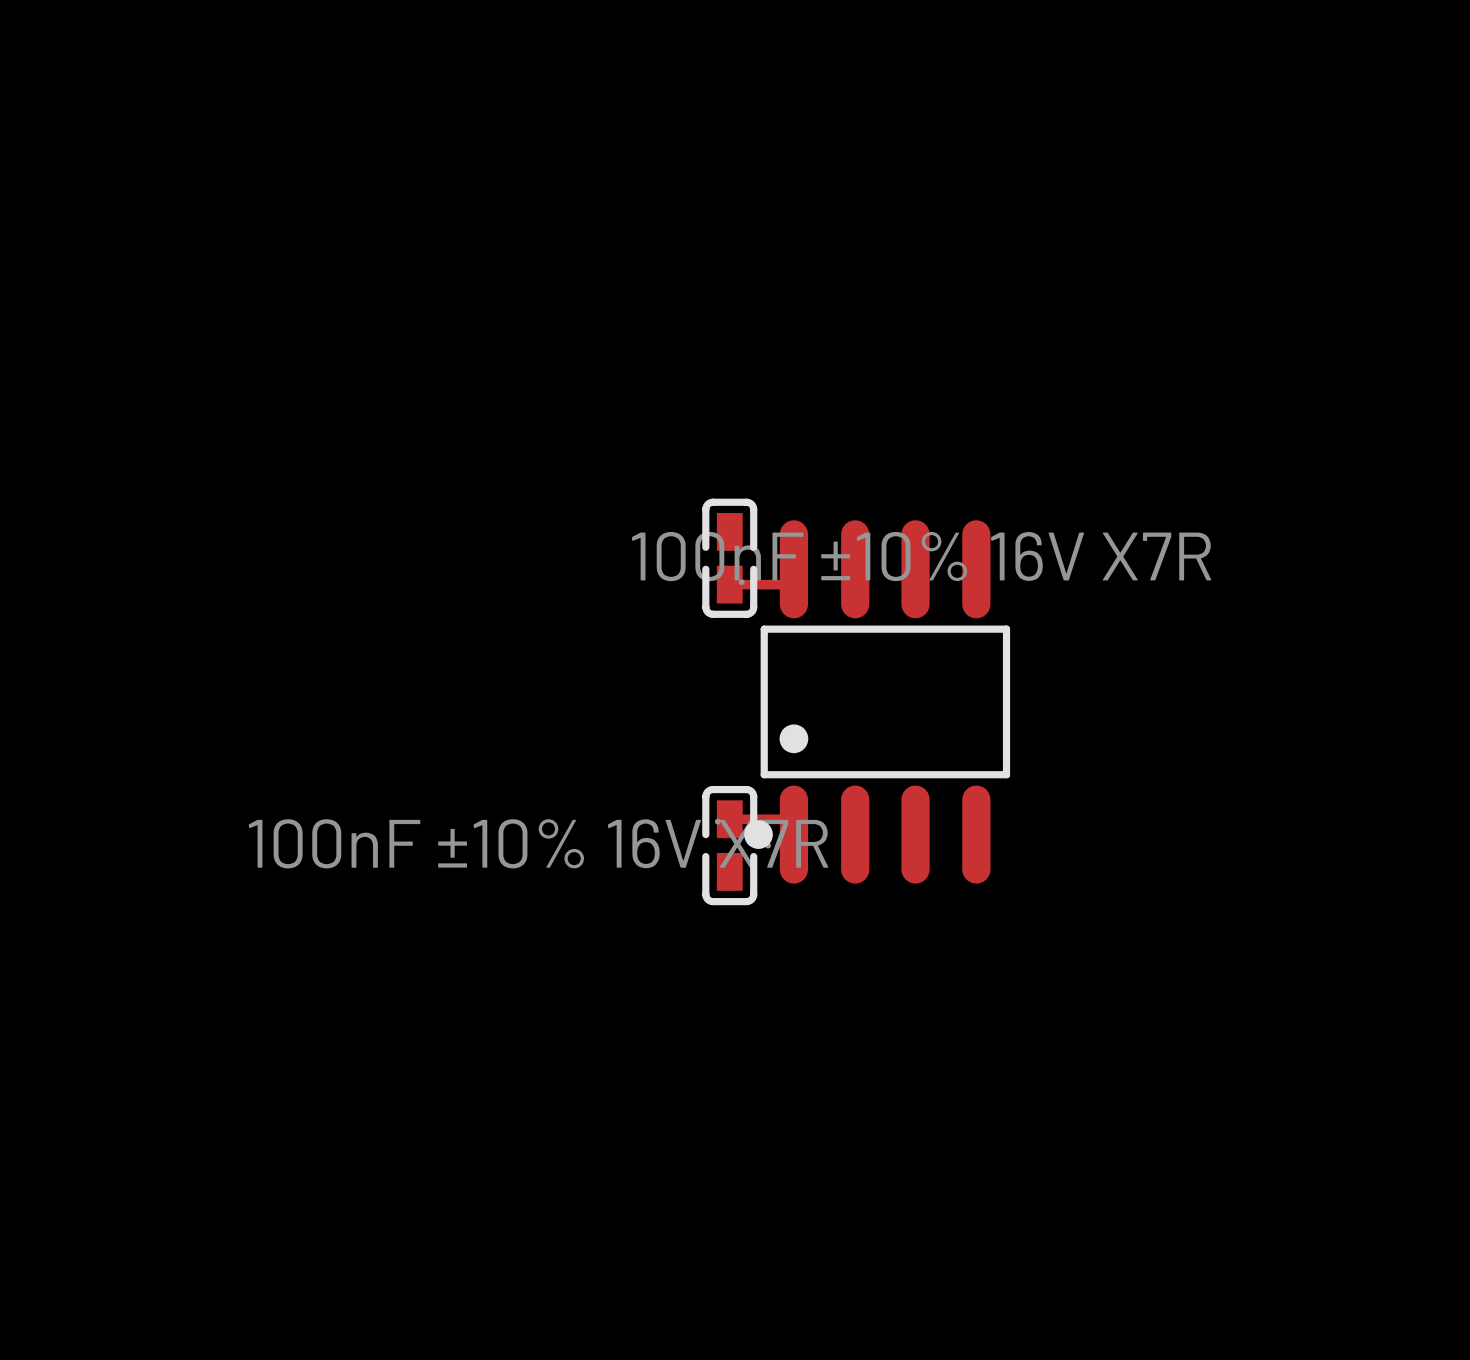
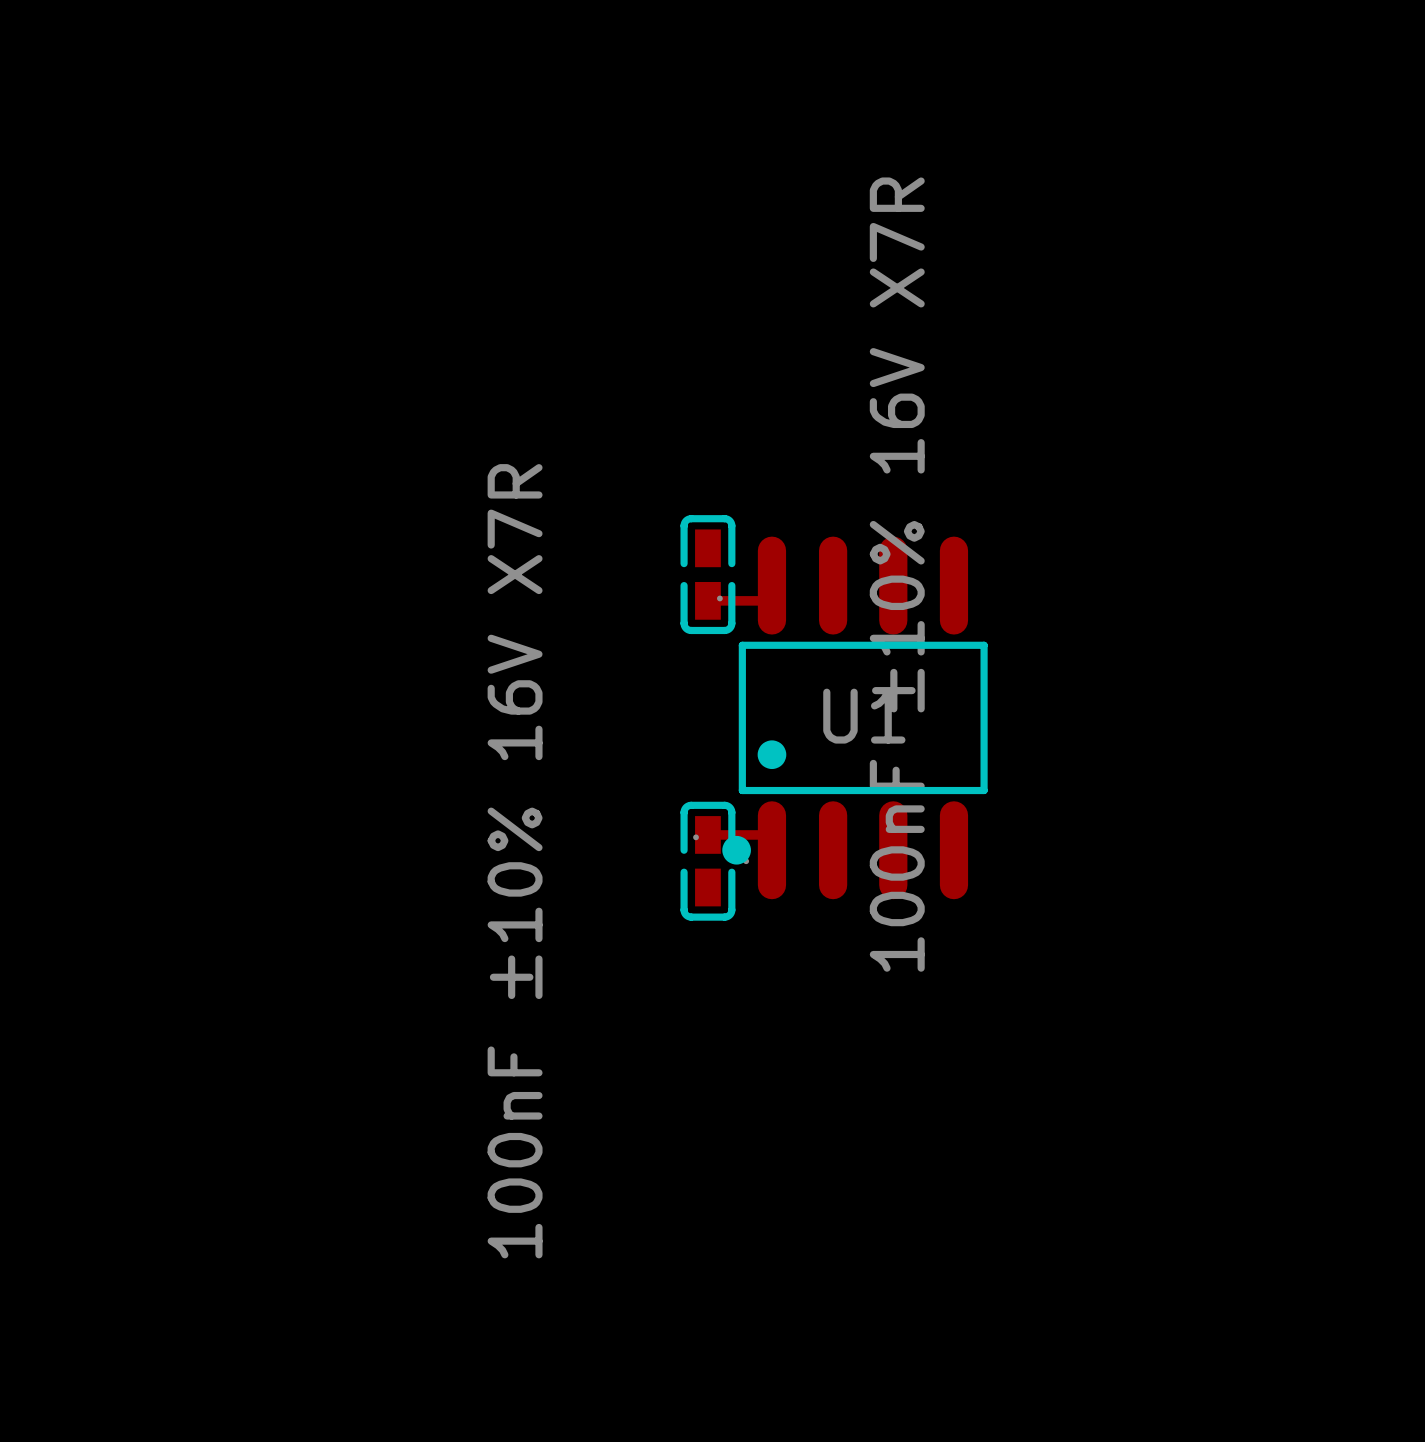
part value rotation: 0° (921, 556) -> 90° counterclockwise (897, 574)
U1 name: none -> U1 (864, 716)
part value rotation: 0° (538, 843) -> 90° counterclockwise (515, 861)

